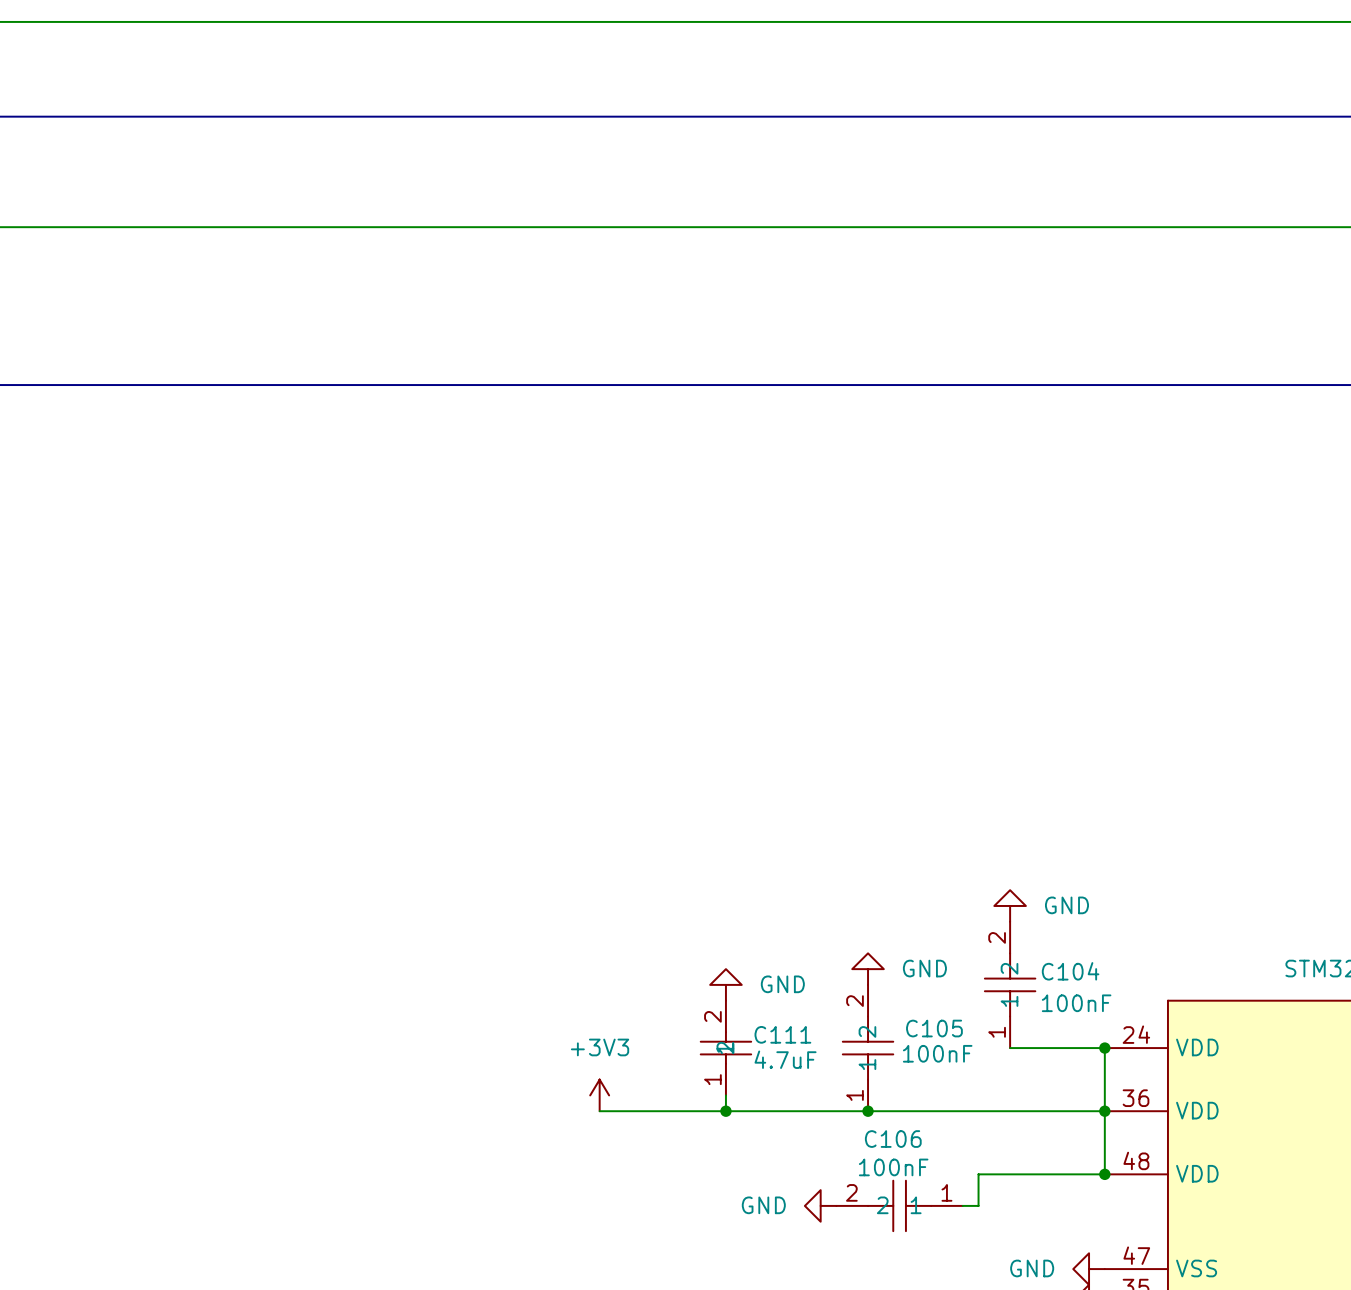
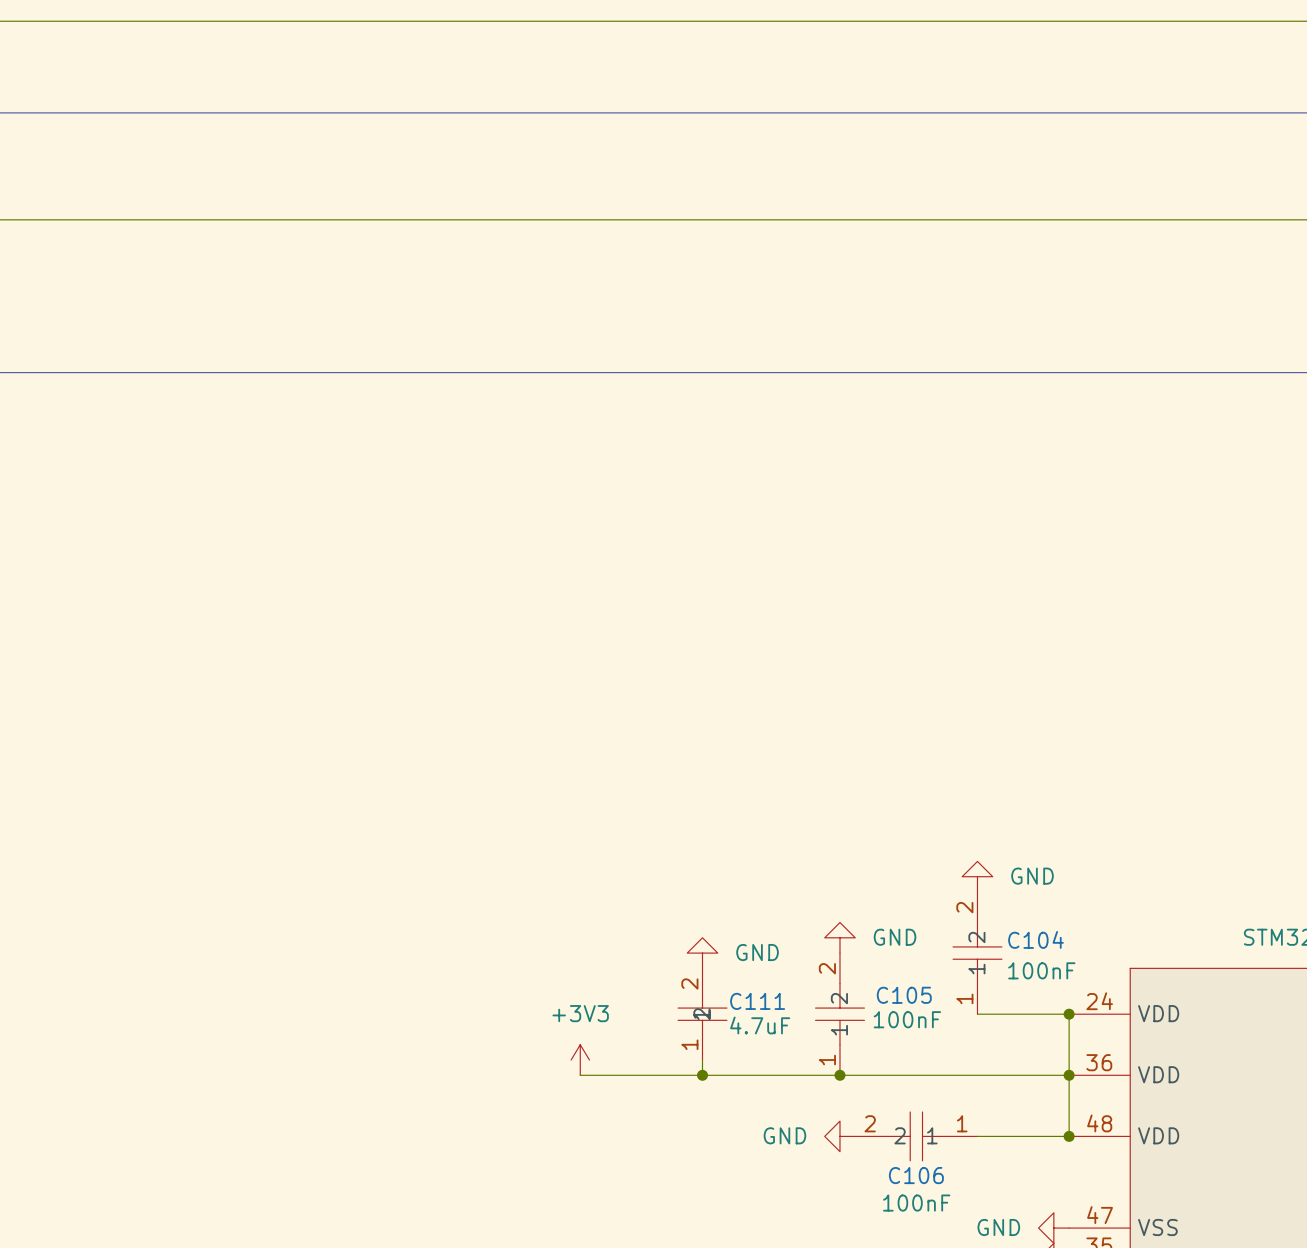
C106 name position: C106 (893, 1139) -> C106 (916, 1175)
C106 value position: 100nF (893, 1167) -> 100nF (916, 1203)
wire: (1010, 1174) (978, 1174) (978, 1205) (962, 1205) -> none
power symbol position: GND (820, 1205) -> GND (839, 1136)
C106 position: (899, 1205) -> (916, 1136)

